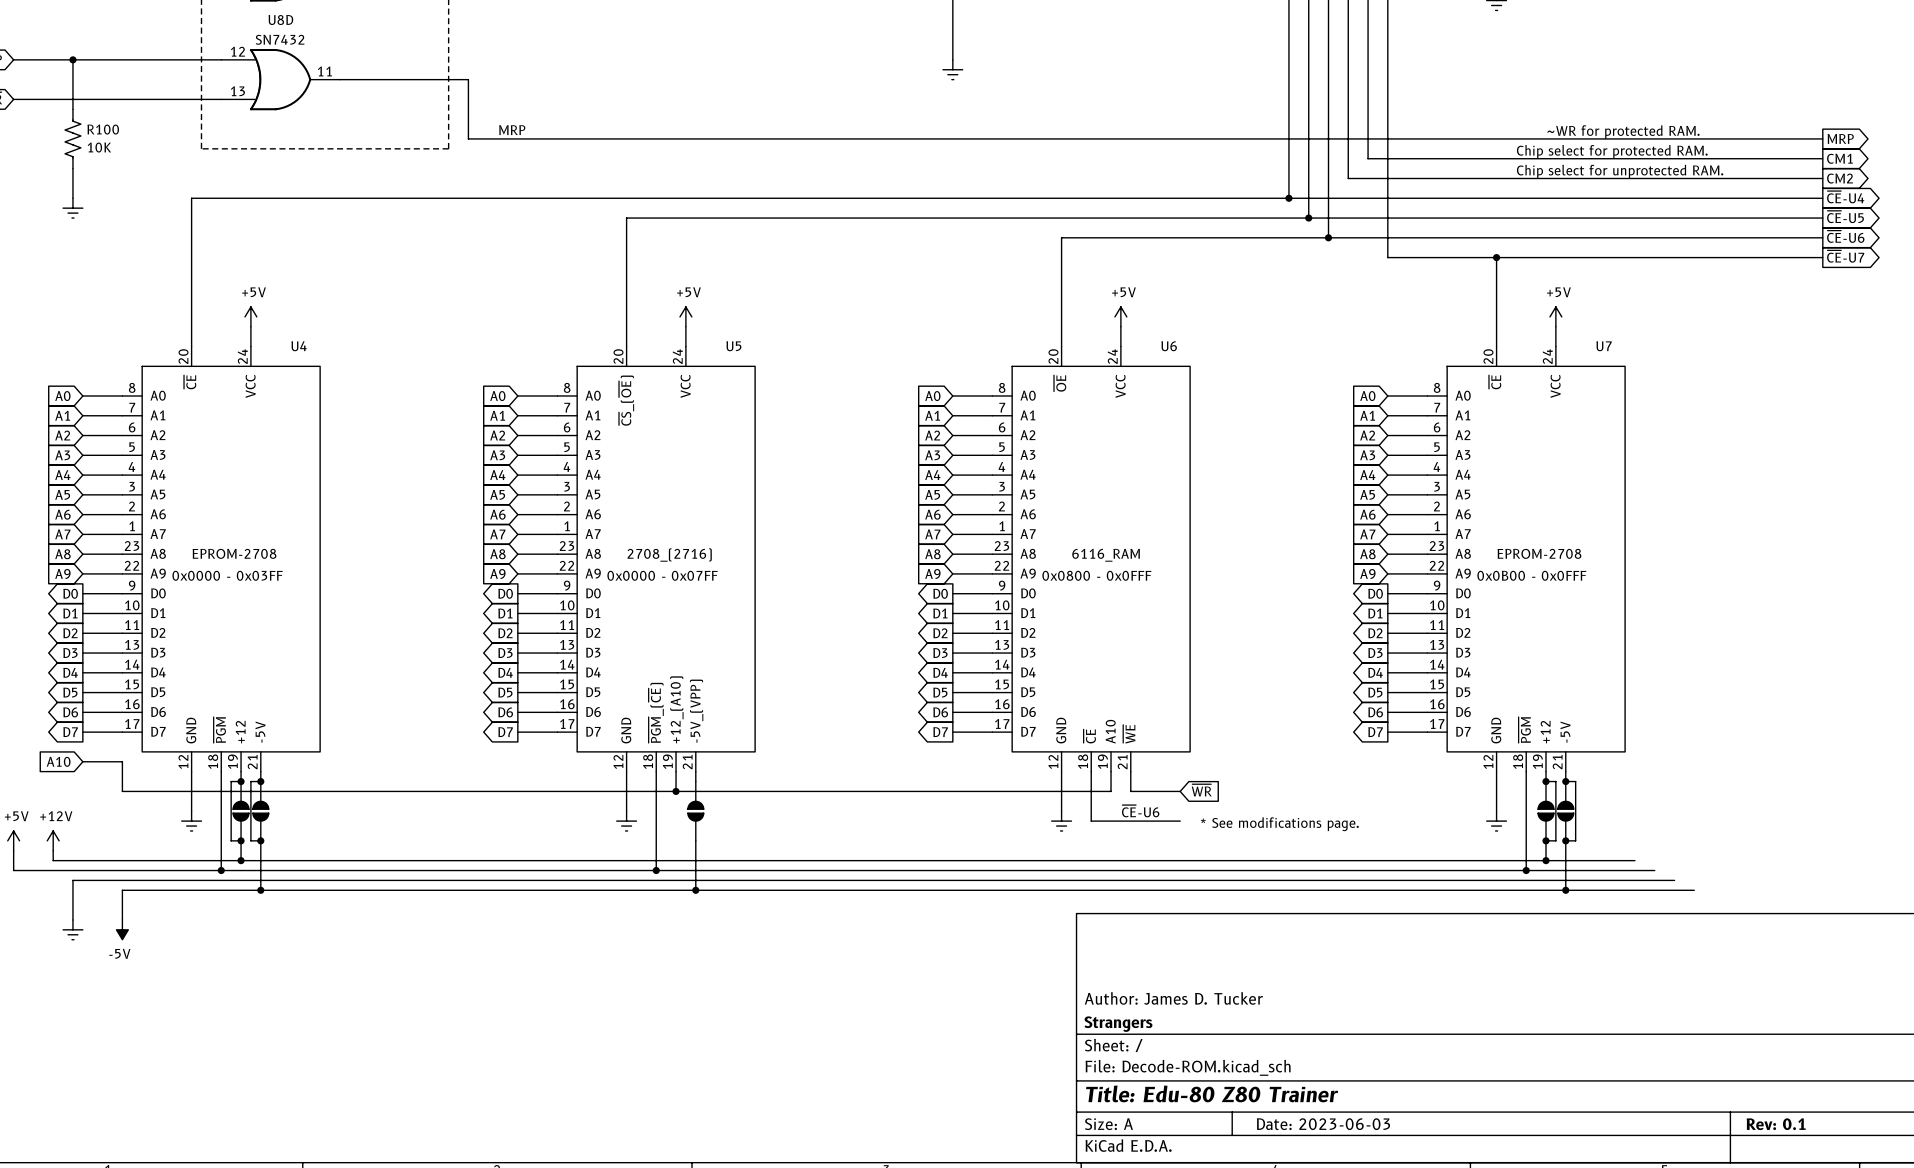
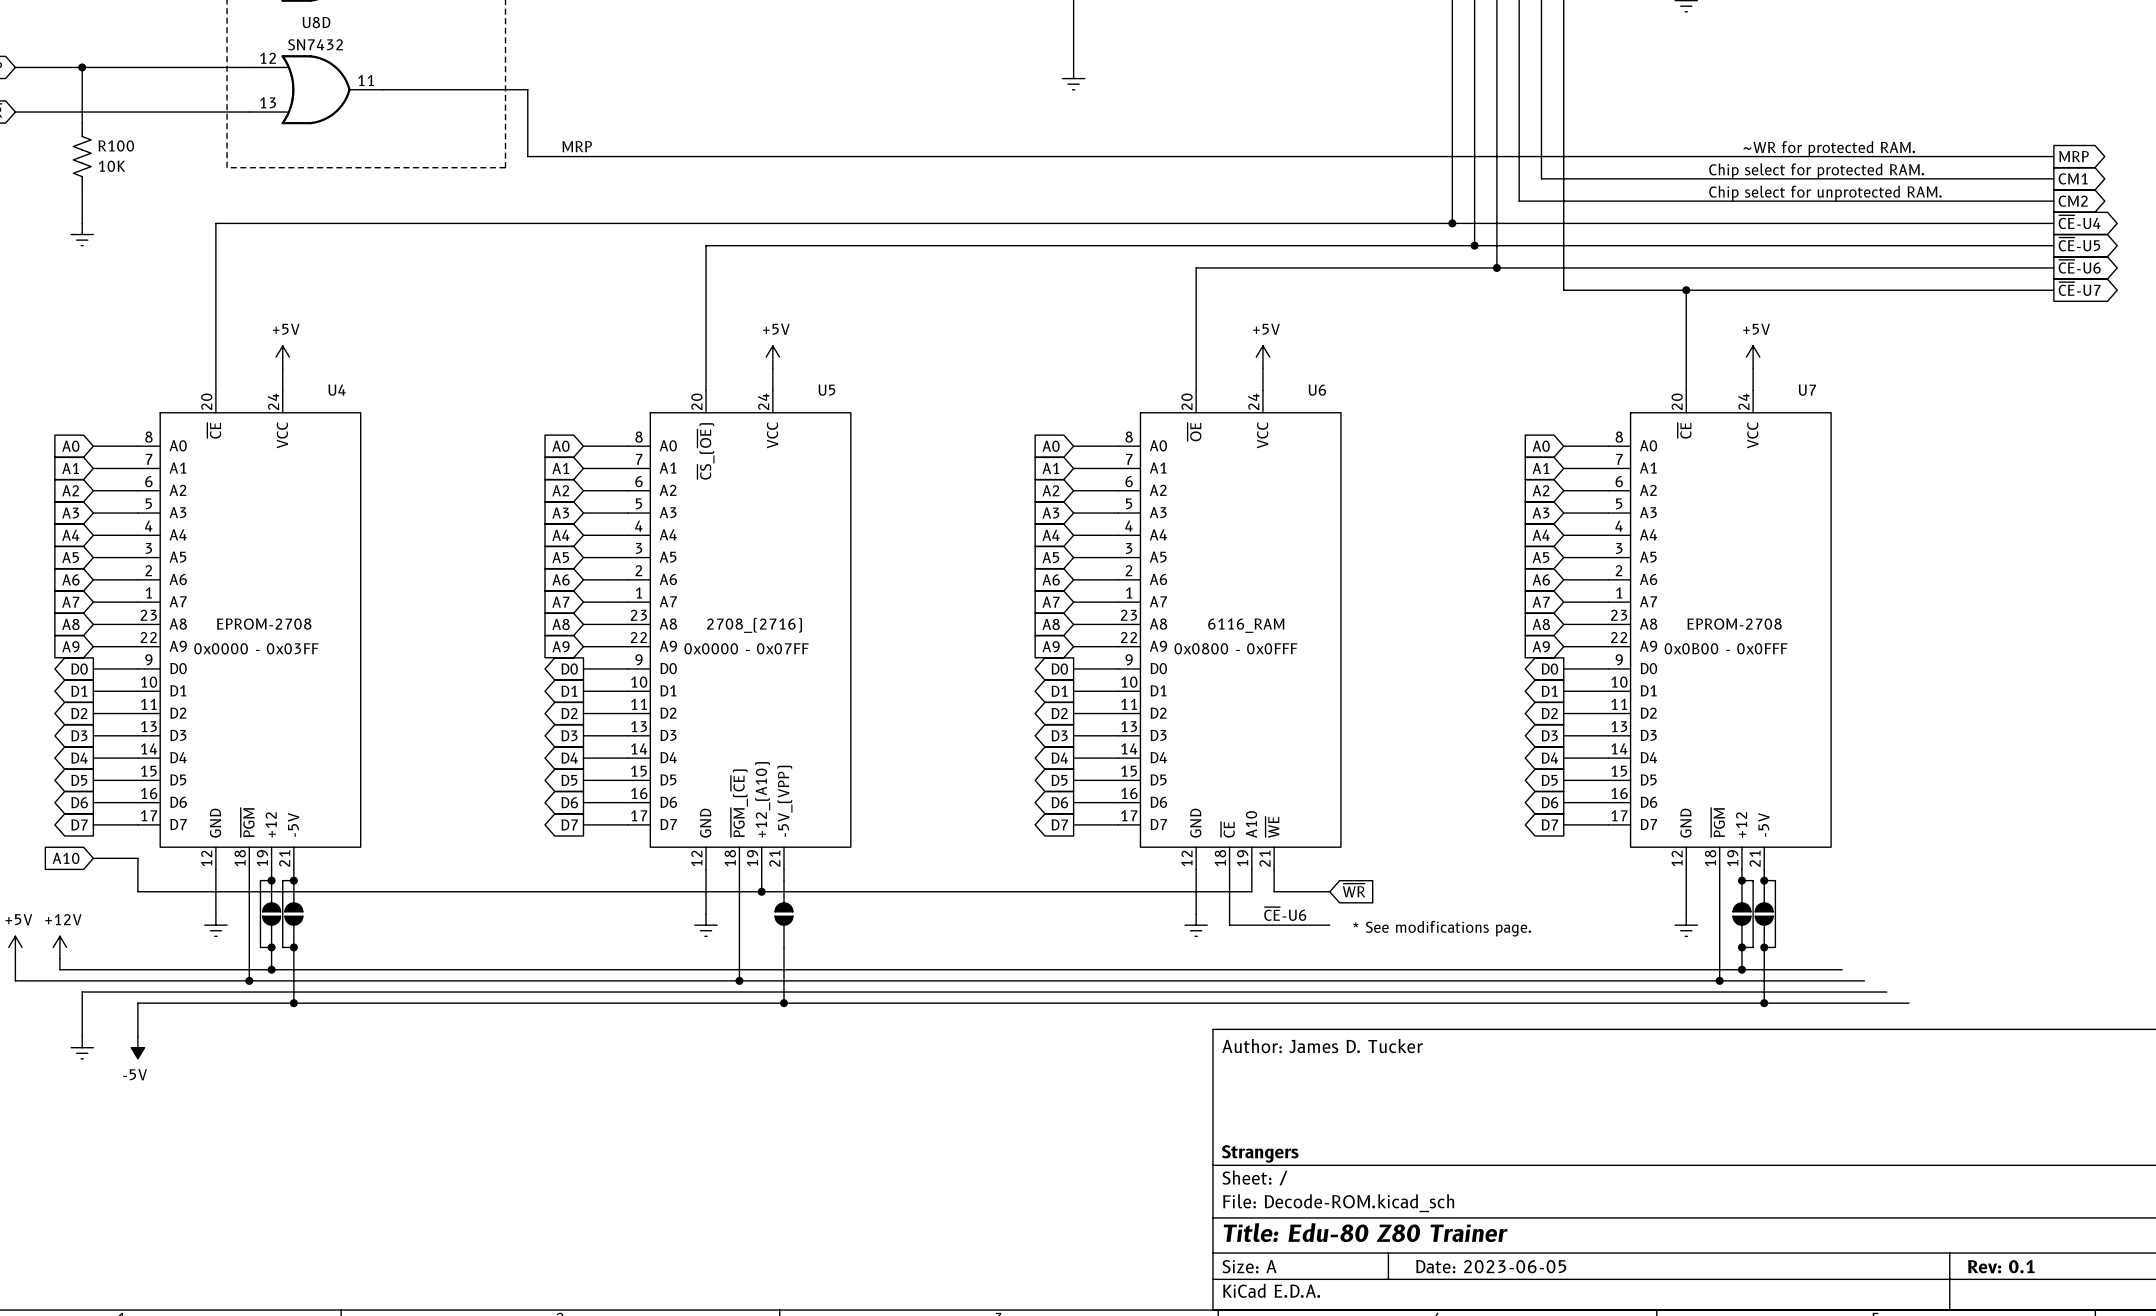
title block position: Author: James D. Tucker (1173, 998) -> Author: James D. Tucker (1322, 1046)
title block: Date: 2023-06-03 (1323, 1124) -> Date: 2023-06-05 (1491, 1266)

